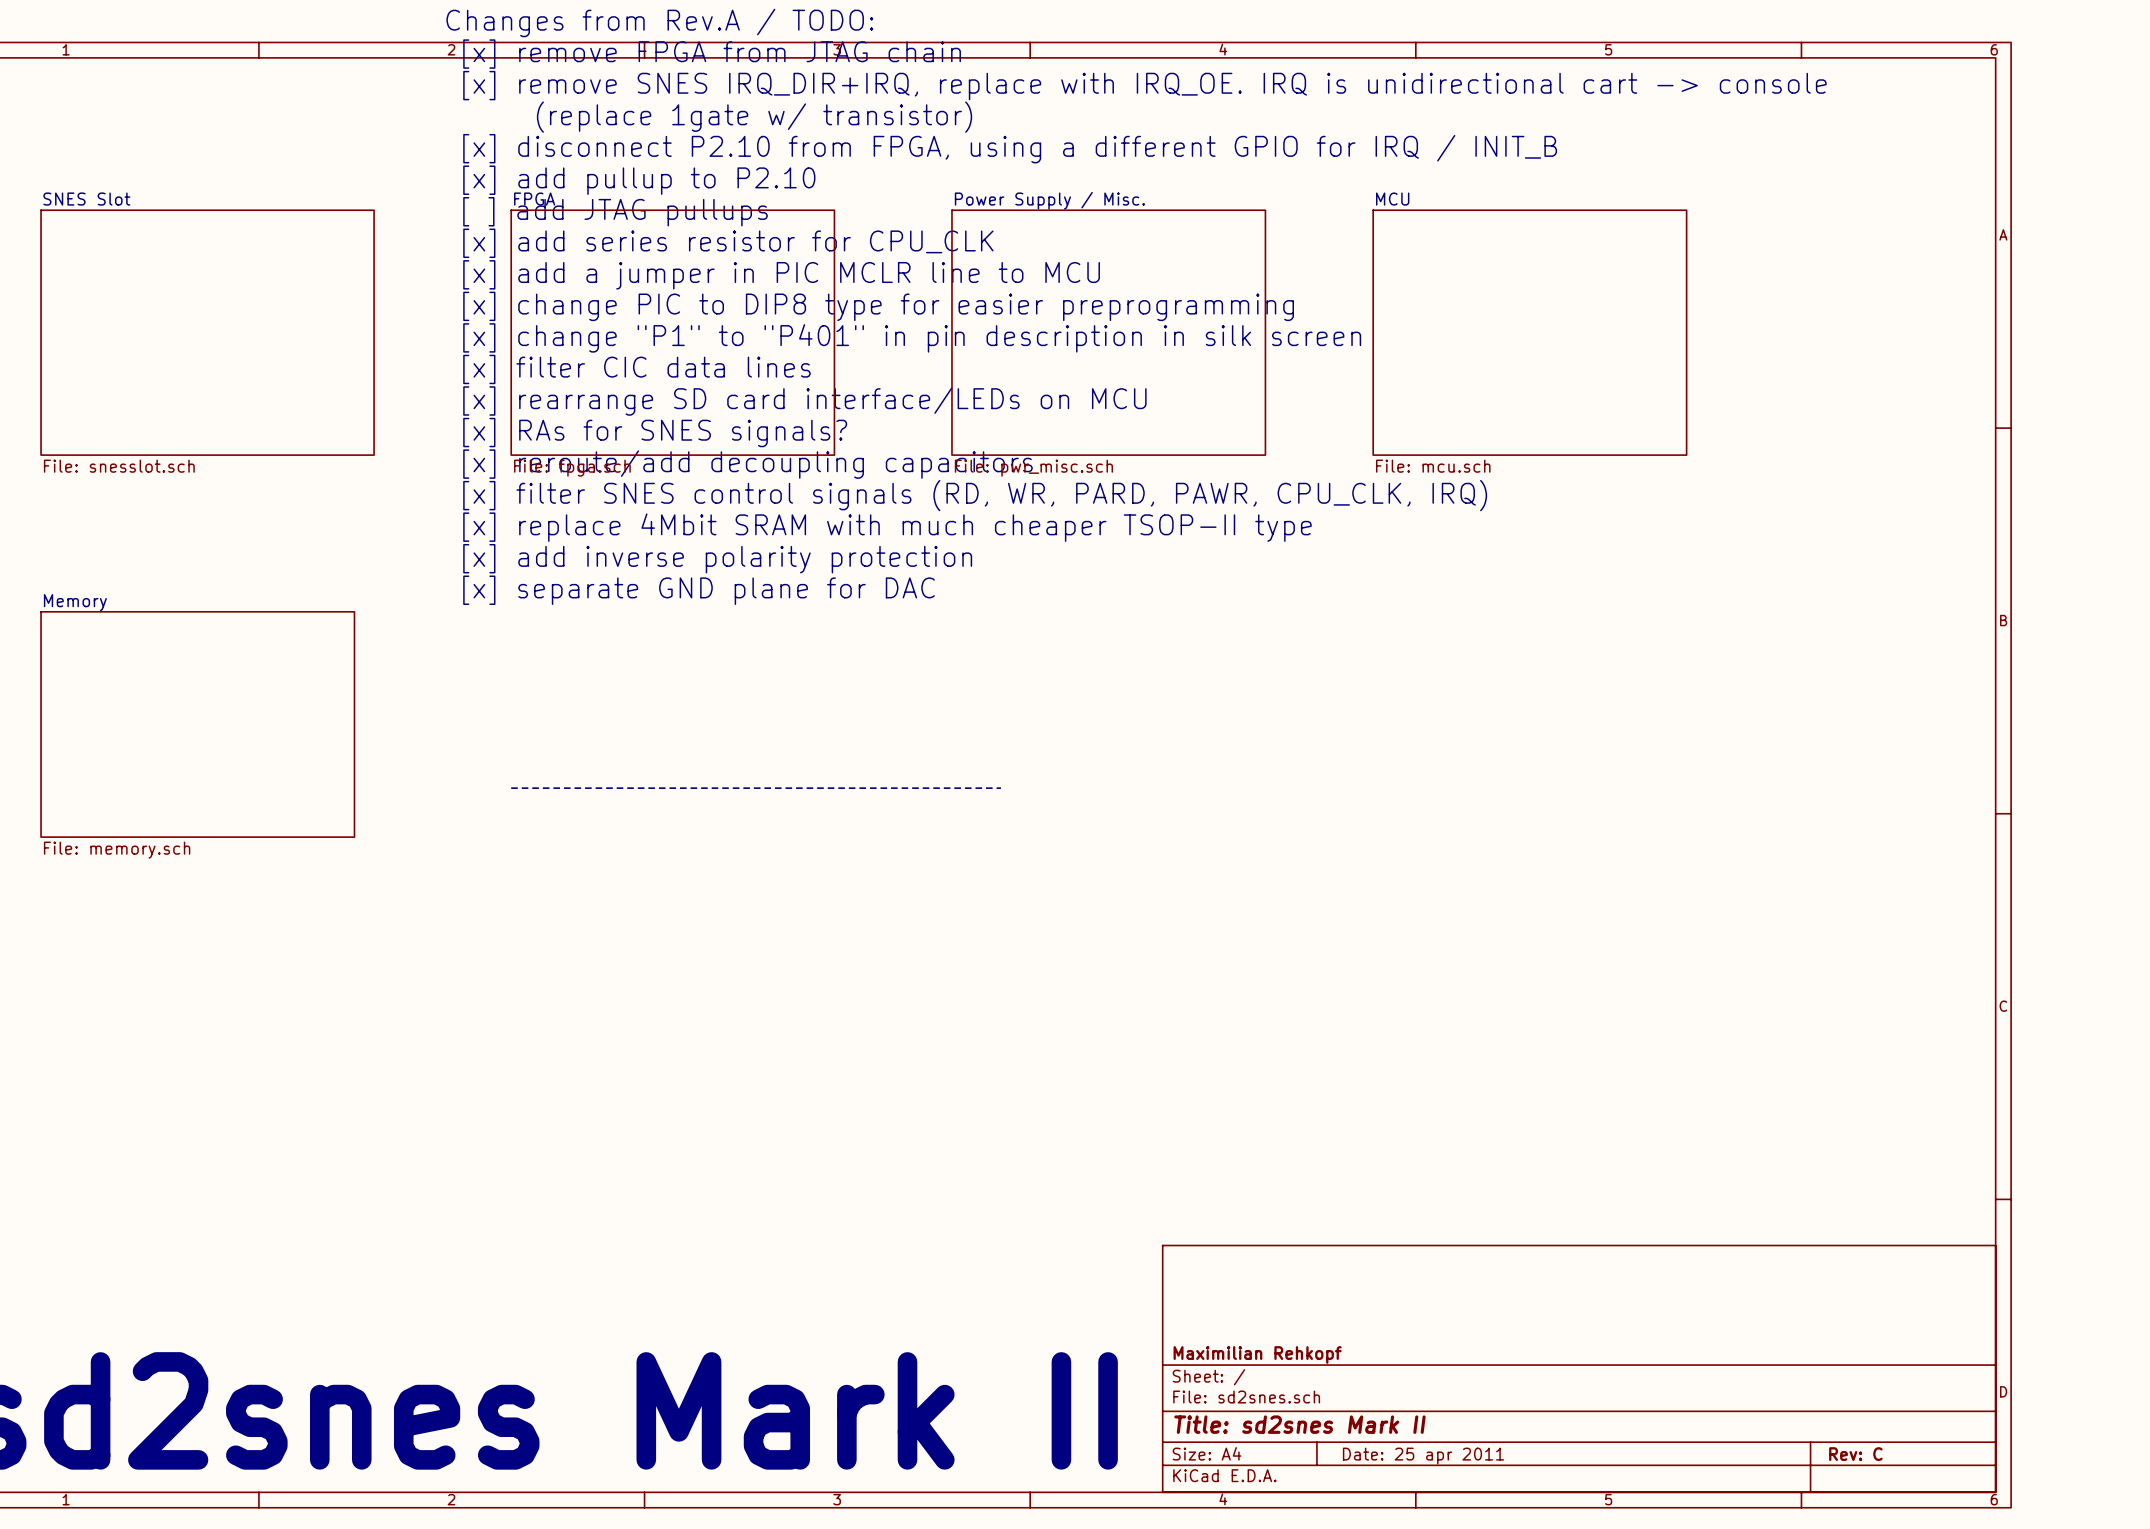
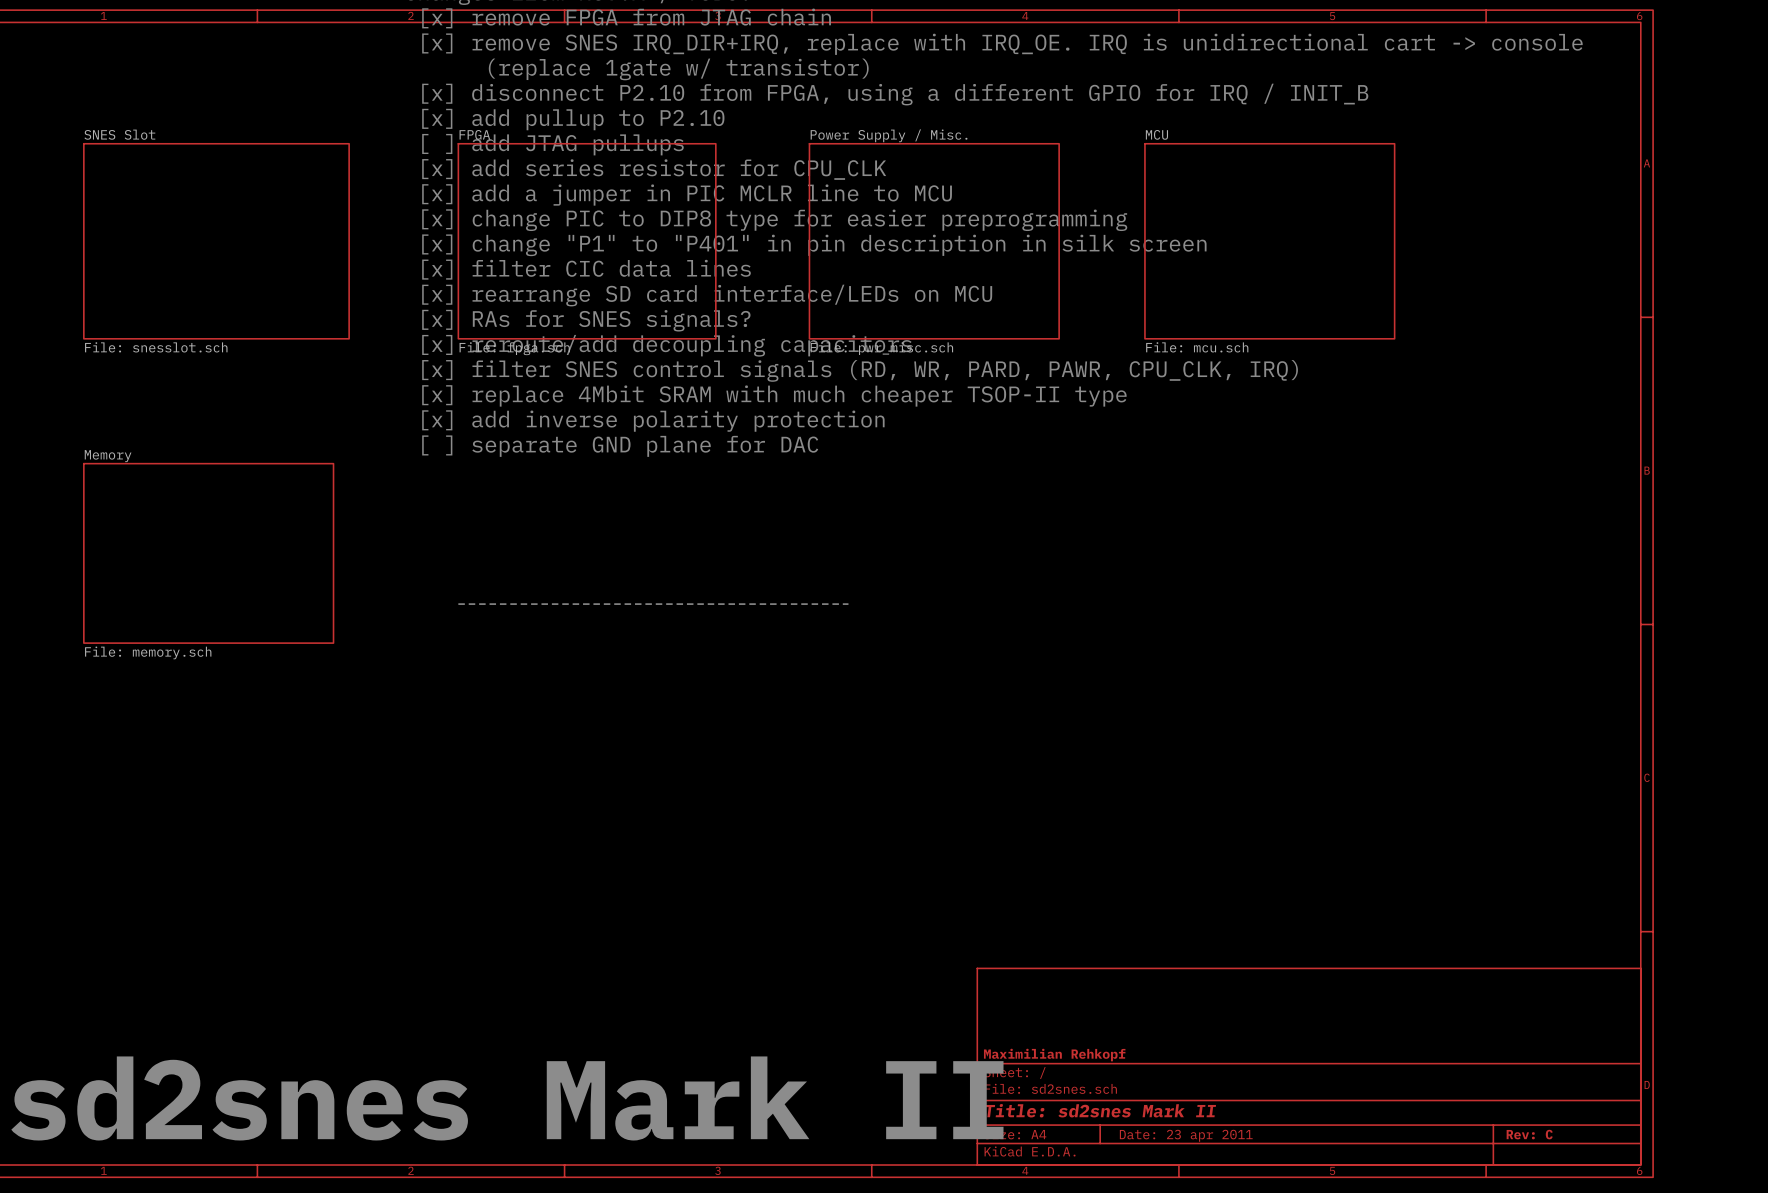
text: [x] separate GND plane for DAC (699, 590) -> [ ] separate GND plane for DAC (620, 446)
title block: Date: 25 apr 2011 (1423, 1456) -> Date: 23 apr 2011 (1186, 1135)

